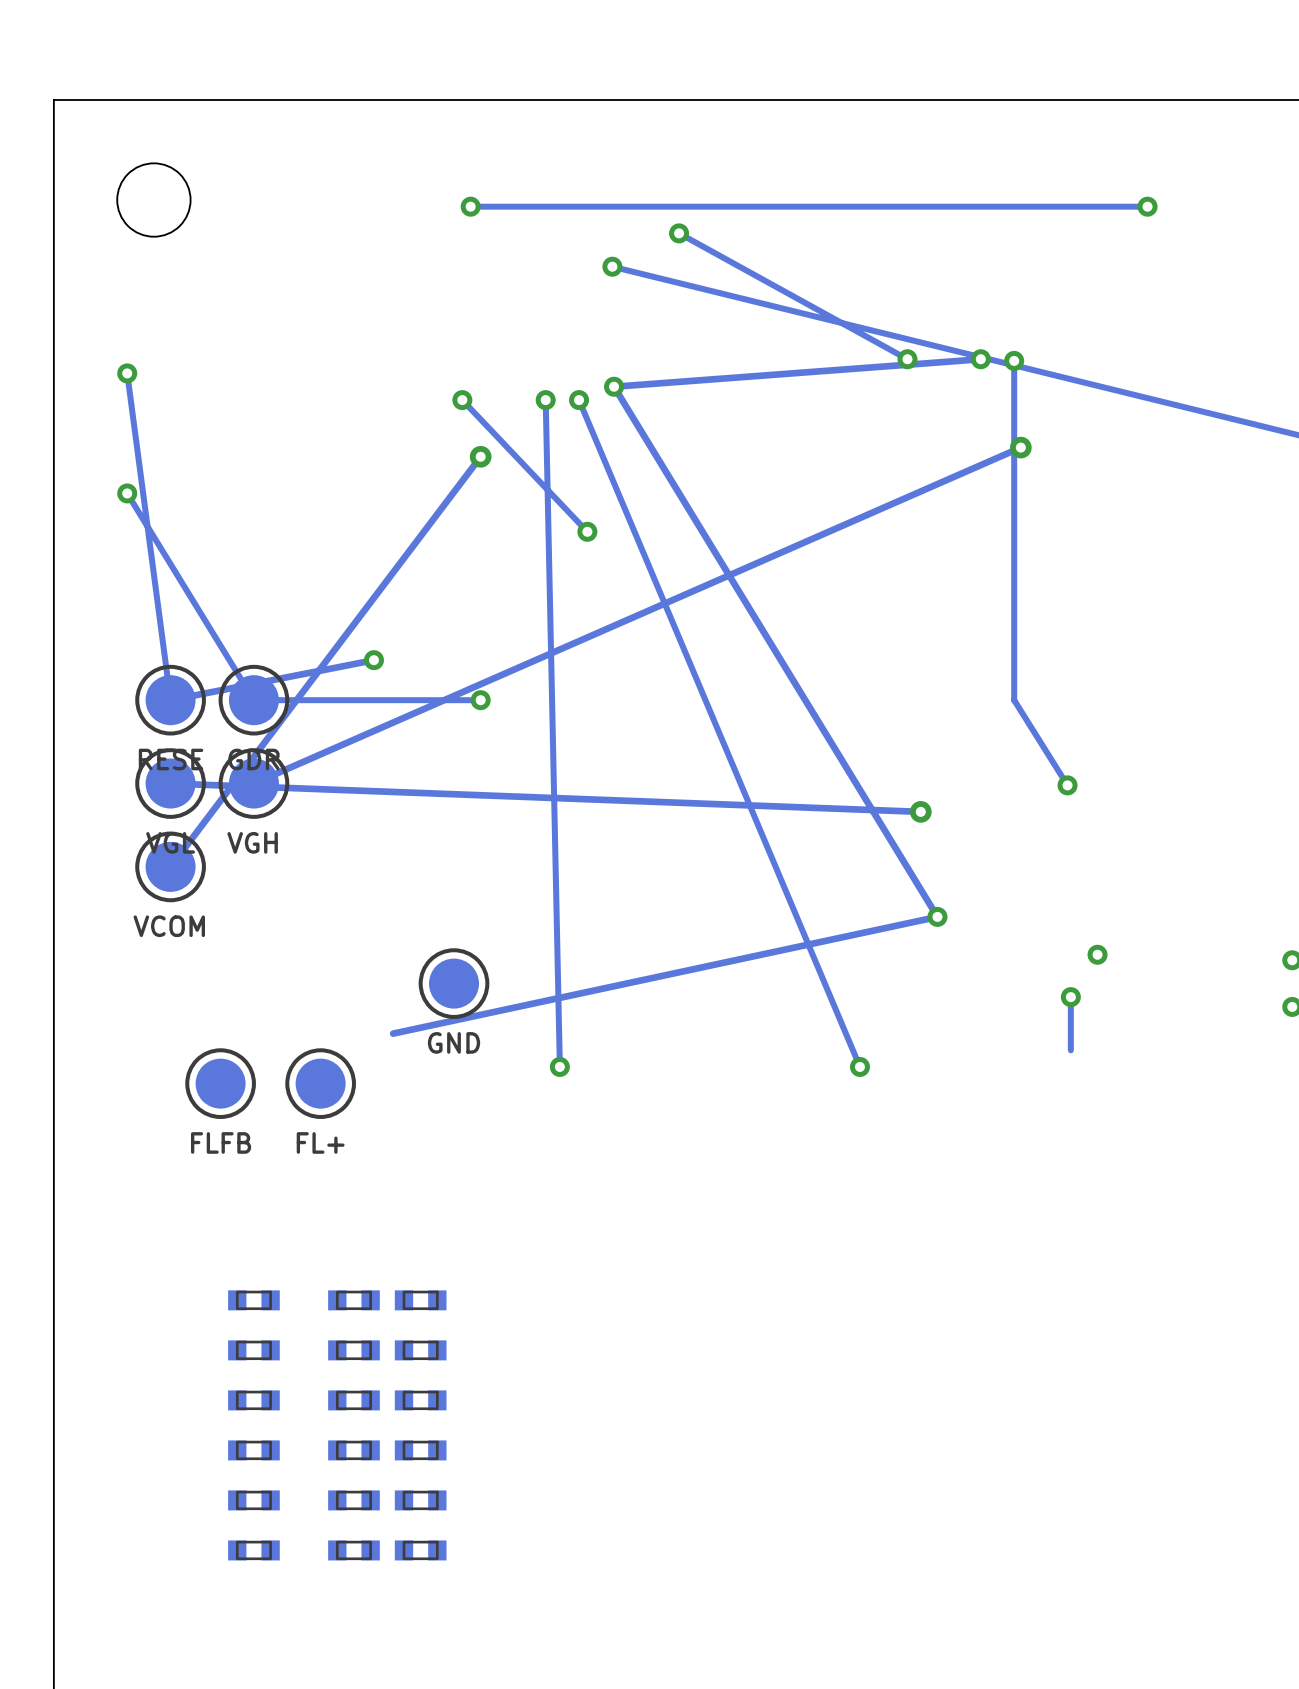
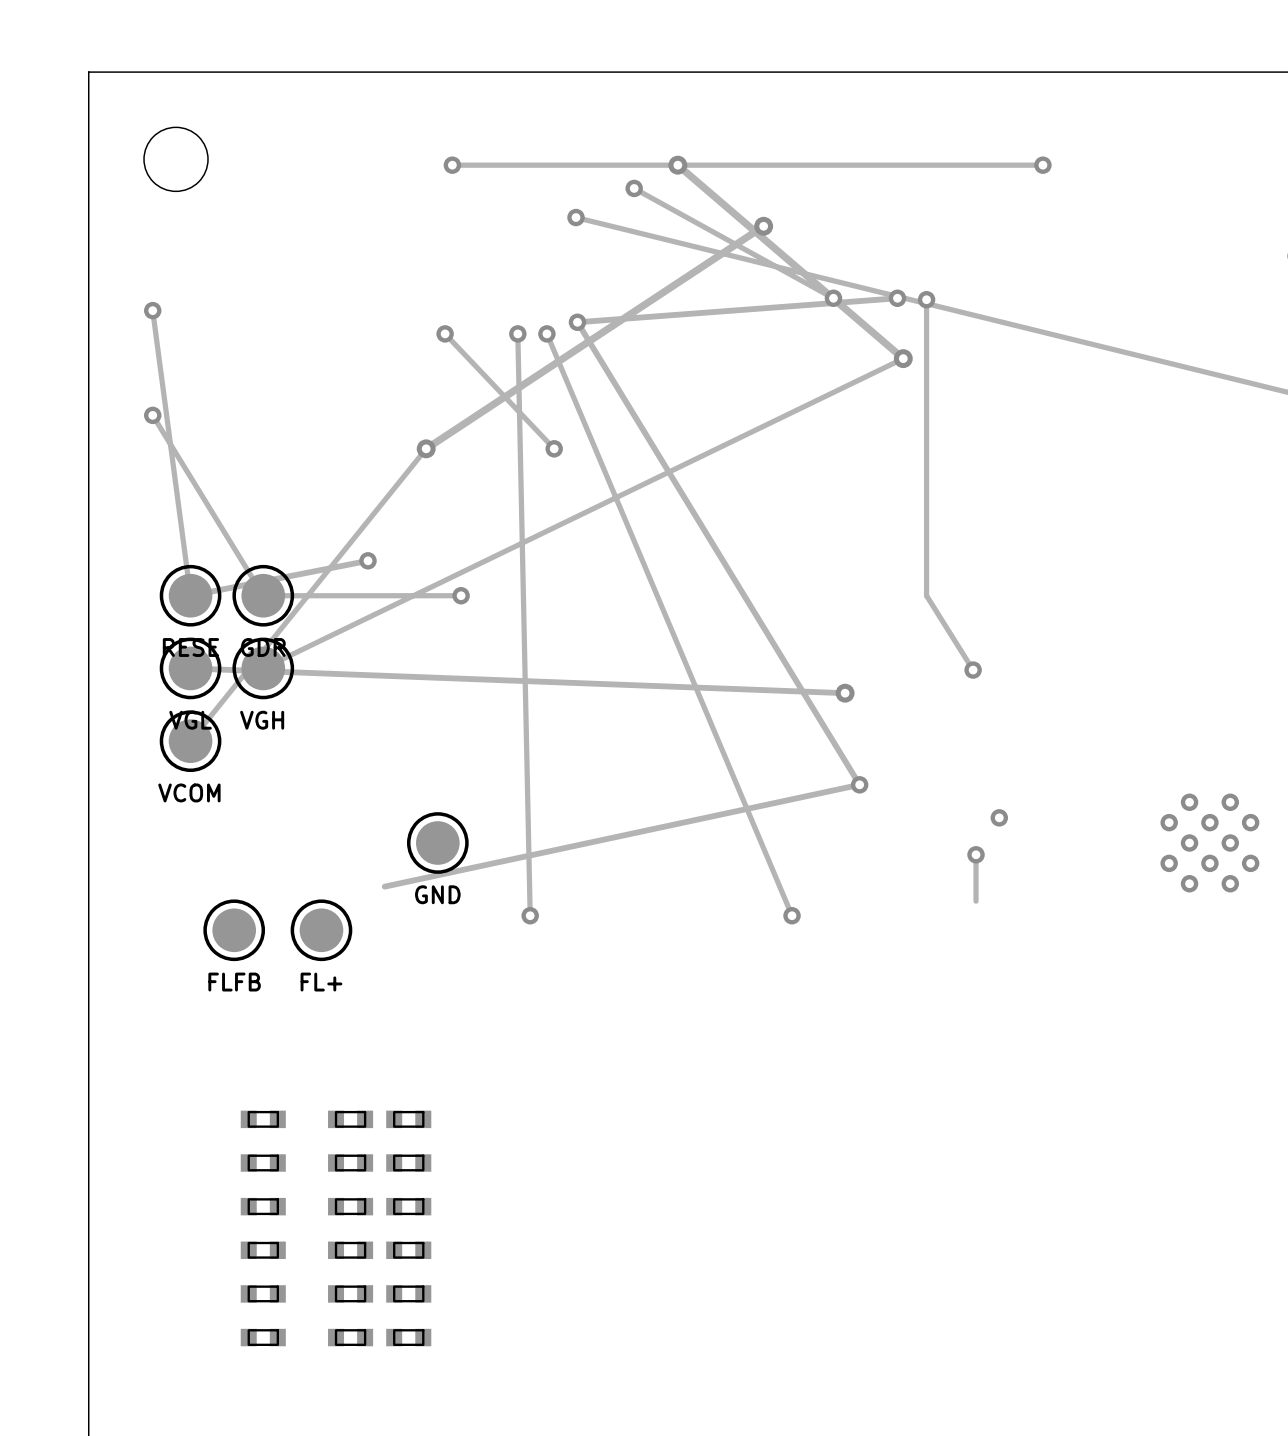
via: none -> (677, 165)
via: none -> (763, 226)
track: (1020, 447) (253, 783) -> (677, 165) (903, 358) (263, 668)
via position: (1020, 447) -> (903, 358)
track: (480, 456) (170, 866) -> (763, 226) (426, 448) (190, 741)
via: (480, 456) -> none
via: none -> (426, 448)

